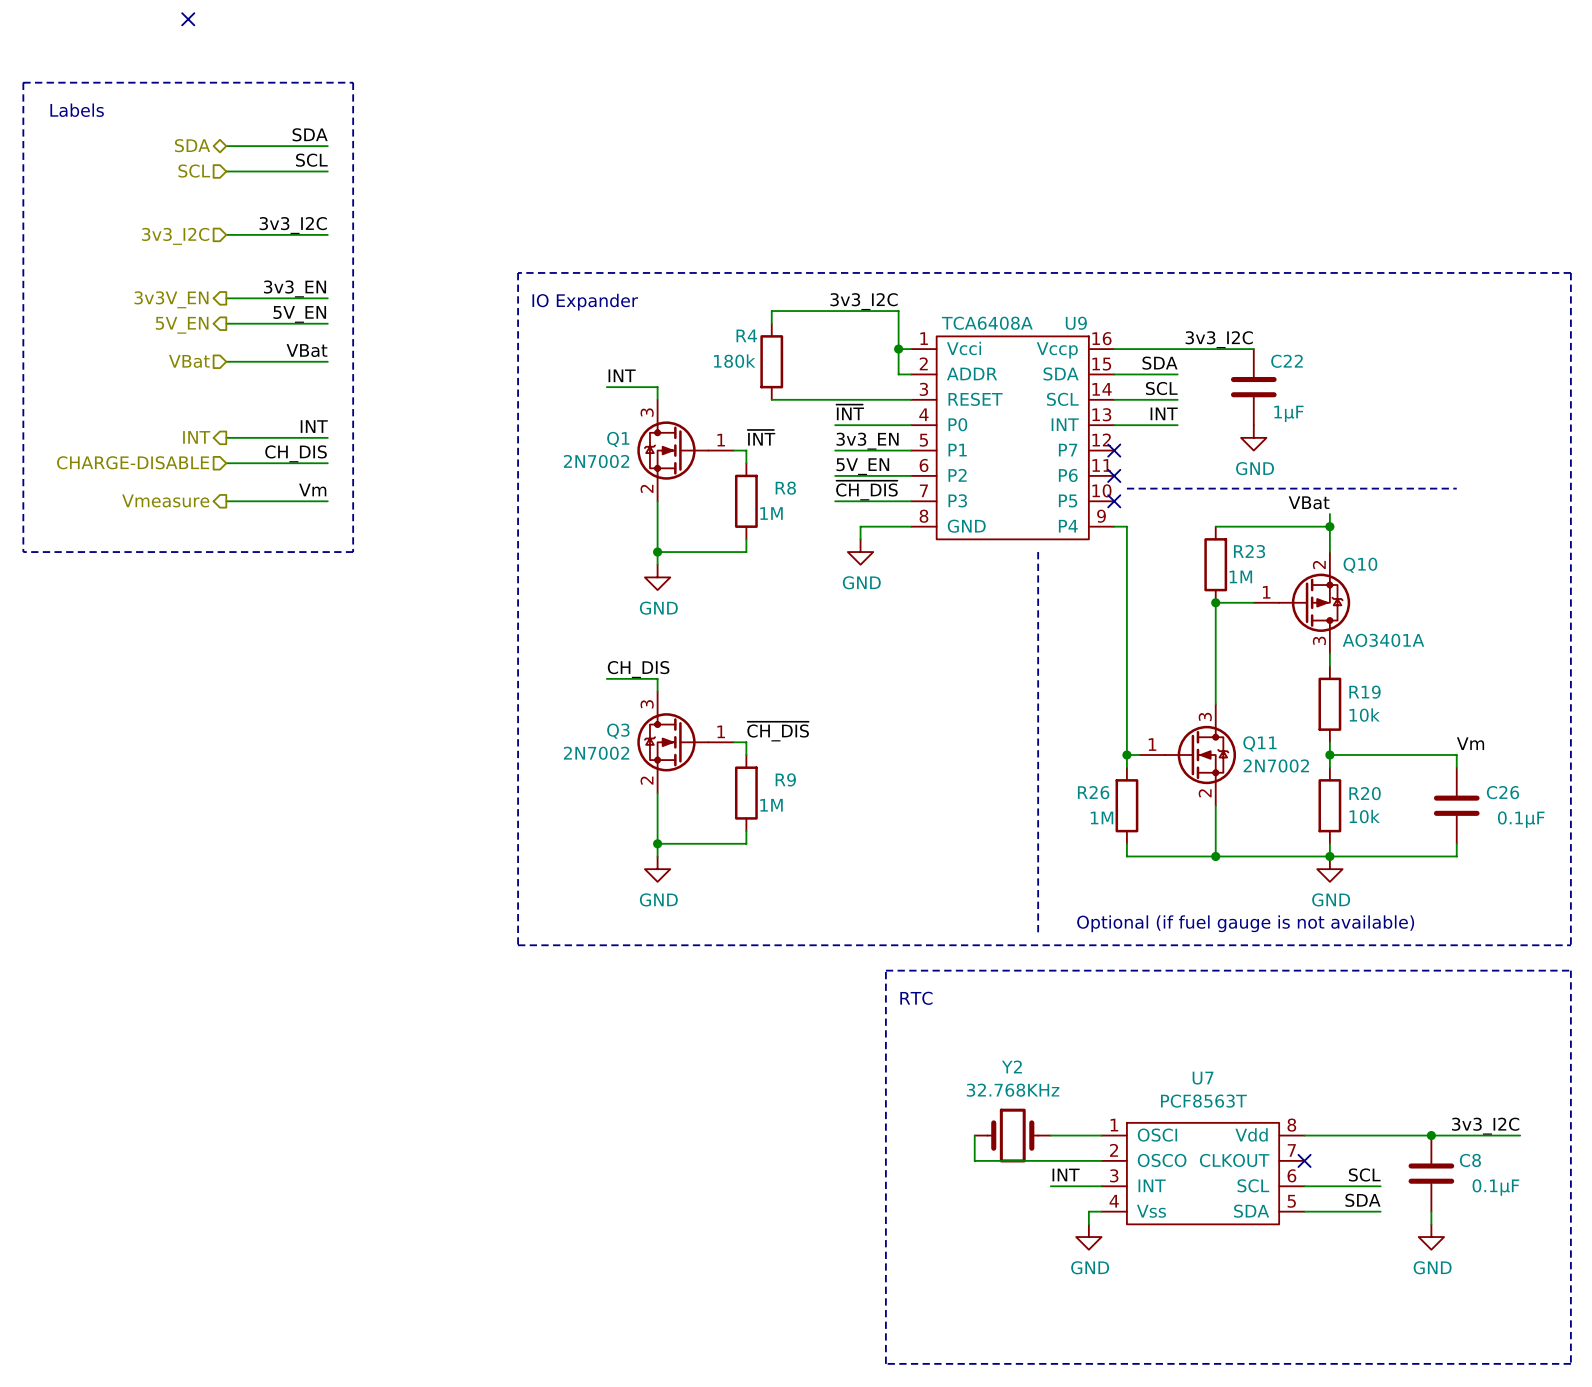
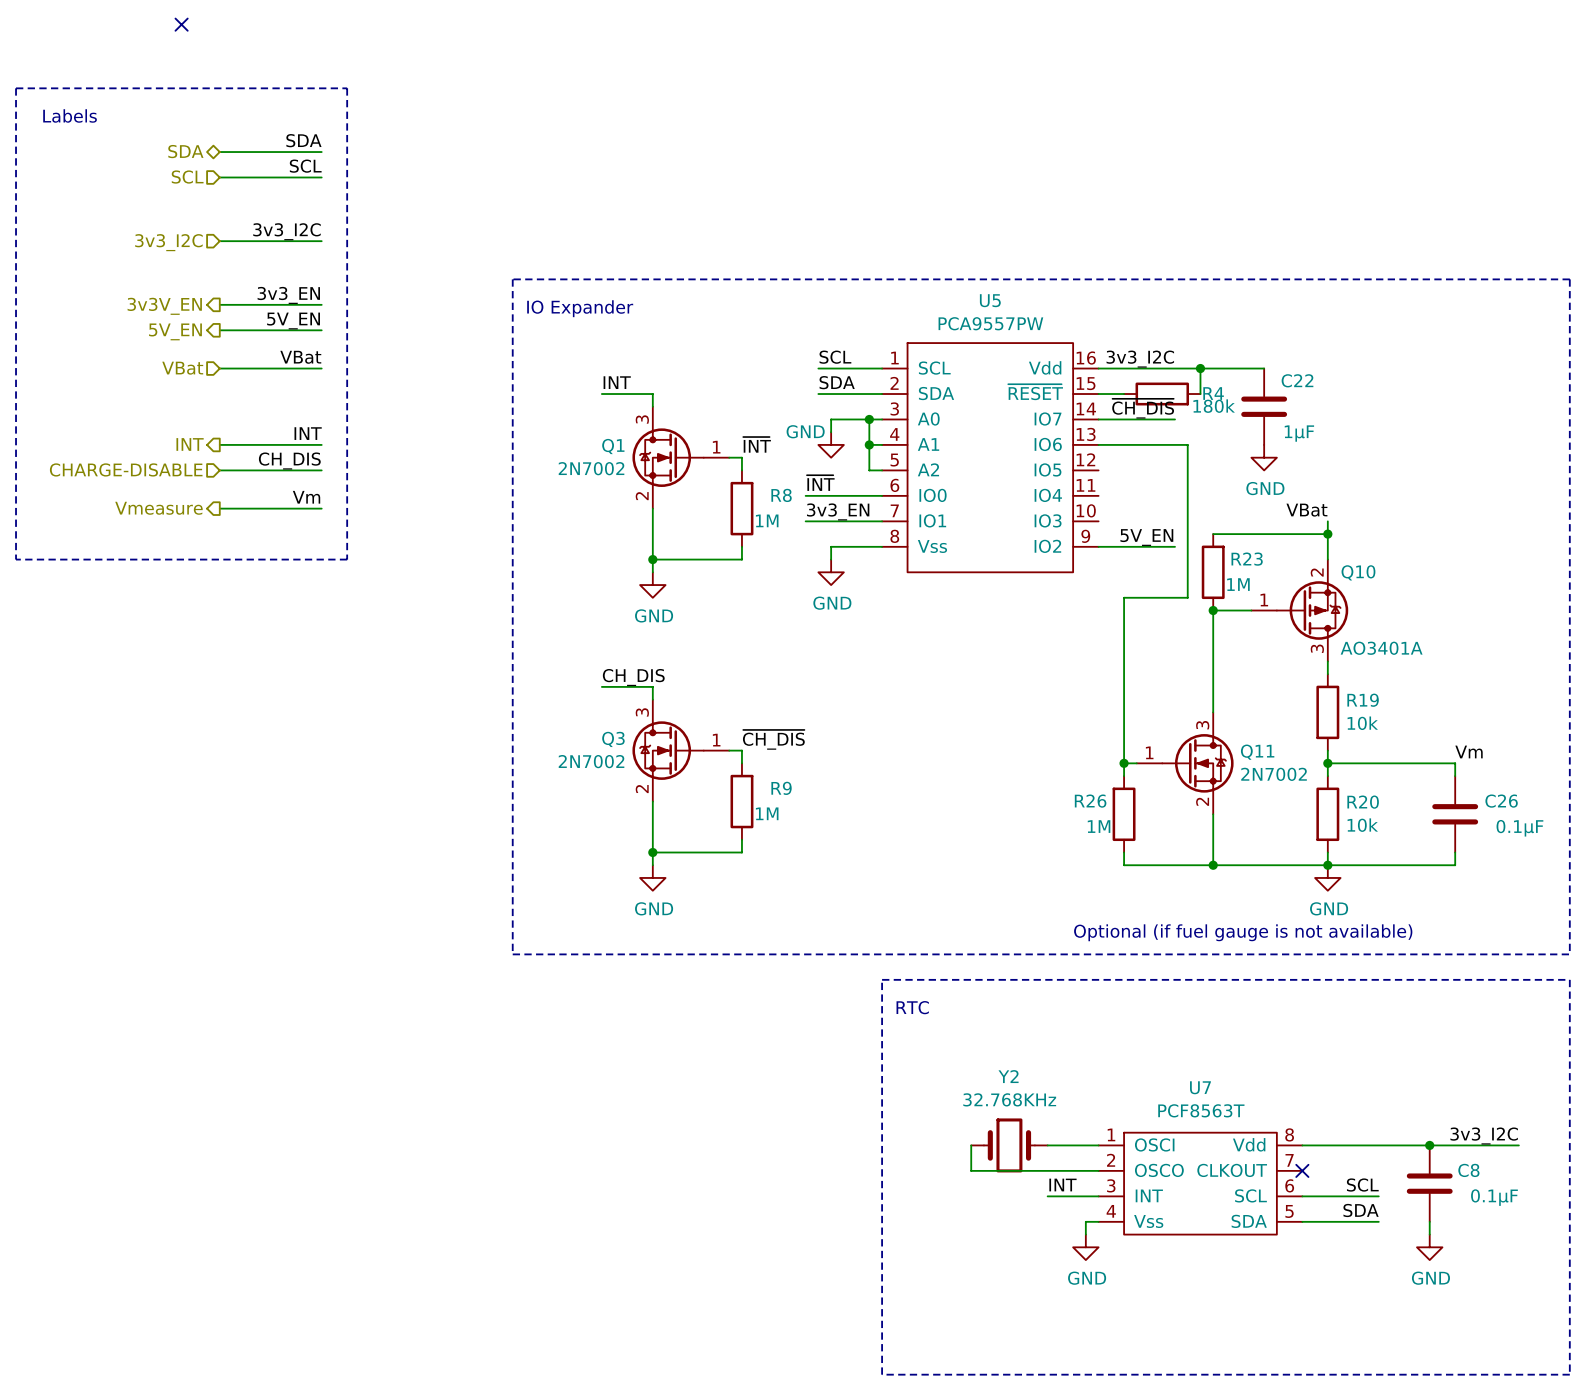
label: 3v3_I2C (864, 301) -> none
wire: (771, 323) (771, 311) (898, 311) (898, 374) (911, 374) -> none
R4 name position: R4 (746, 335) -> R4 (1213, 393)
label position: 3v3_I2C (1219, 339) -> 3v3_I2C (1140, 359)
wire: (898, 349) (911, 349) -> (869, 444) (882, 444)
junction: (898, 349) -> none
wire: (1114, 349) (1253, 349) -> none
label: none -> SCL (835, 357)
R4 value position: 180k (734, 361) -> 180k (1214, 406)
R4 rotation: 0° (771, 361) -> 90° clockwise (1162, 394)
R4 position: (771, 361) -> (1162, 394)
wire: none -> (818, 368) (882, 368)
wire: none -> (1098, 368) (1264, 368)
wire: none -> (1200, 368) (1200, 394)
junction: none -> (1200, 368)
label: SDA (1160, 363) -> none
wire: (1114, 374) (1177, 374) -> none
label: none -> SDA (837, 382)
wire: none -> (818, 394) (882, 394)
wire: none -> (1098, 394) (1124, 394)
C22 position: (1253, 387) -> (1264, 406)
label: SCL (1161, 388) -> none
wire: (771, 399) (911, 399) -> none
wire: (1114, 399) (1177, 399) -> none
label: none -> ~{CH_DIS} (1143, 408)
label position: ~{INT} (850, 412) -> ~{INT} (820, 483)
wire: none -> (869, 419) (869, 470) (882, 470)
junction: none -> (869, 419)
wire: none -> (1098, 419) (1175, 419)
label: INT (1164, 413) -> none
wire: (835, 425) (911, 425) -> (831, 432) (831, 419) (882, 419)
wire: (1114, 425) (1177, 425) -> none
power symbol: none -> GND (831, 444)
junction: none -> (869, 444)
U9: TCA6408A (1012, 437) -> none
power symbol position: GND (1253, 437) -> GND (1264, 457)
label position: 3v3_EN (867, 441) -> 3v3_EN (838, 511)
wire: (835, 450) (911, 450) -> none
U5: none -> PCA9557PW (990, 457)
no-connect mark: (1114, 450) -> none
label: 5V_EN (862, 466) -> none
wire: (835, 475) (911, 475) -> (805, 495) (882, 495)
no-connect mark: (1114, 475) -> none
line: (1126, 488) (1456, 488) -> none
label: ~{CH_DIS} (866, 490) -> none
wire: (835, 501) (911, 501) -> (805, 521) (882, 521)
no-connect mark: (1114, 501) -> none
wire: (911, 526) (860, 526) (860, 539) -> (882, 546) (831, 546) (831, 559)
wire: (1114, 526) (1126, 526) (1126, 590) -> (1098, 444) (1187, 444) (1187, 597) (1124, 597)
label: none -> 5V_EN (1146, 537)
wire: none -> (1098, 546) (1175, 546)
power symbol position: GND (860, 552) -> GND (831, 572)
line: (1038, 552) (1038, 932) -> none

